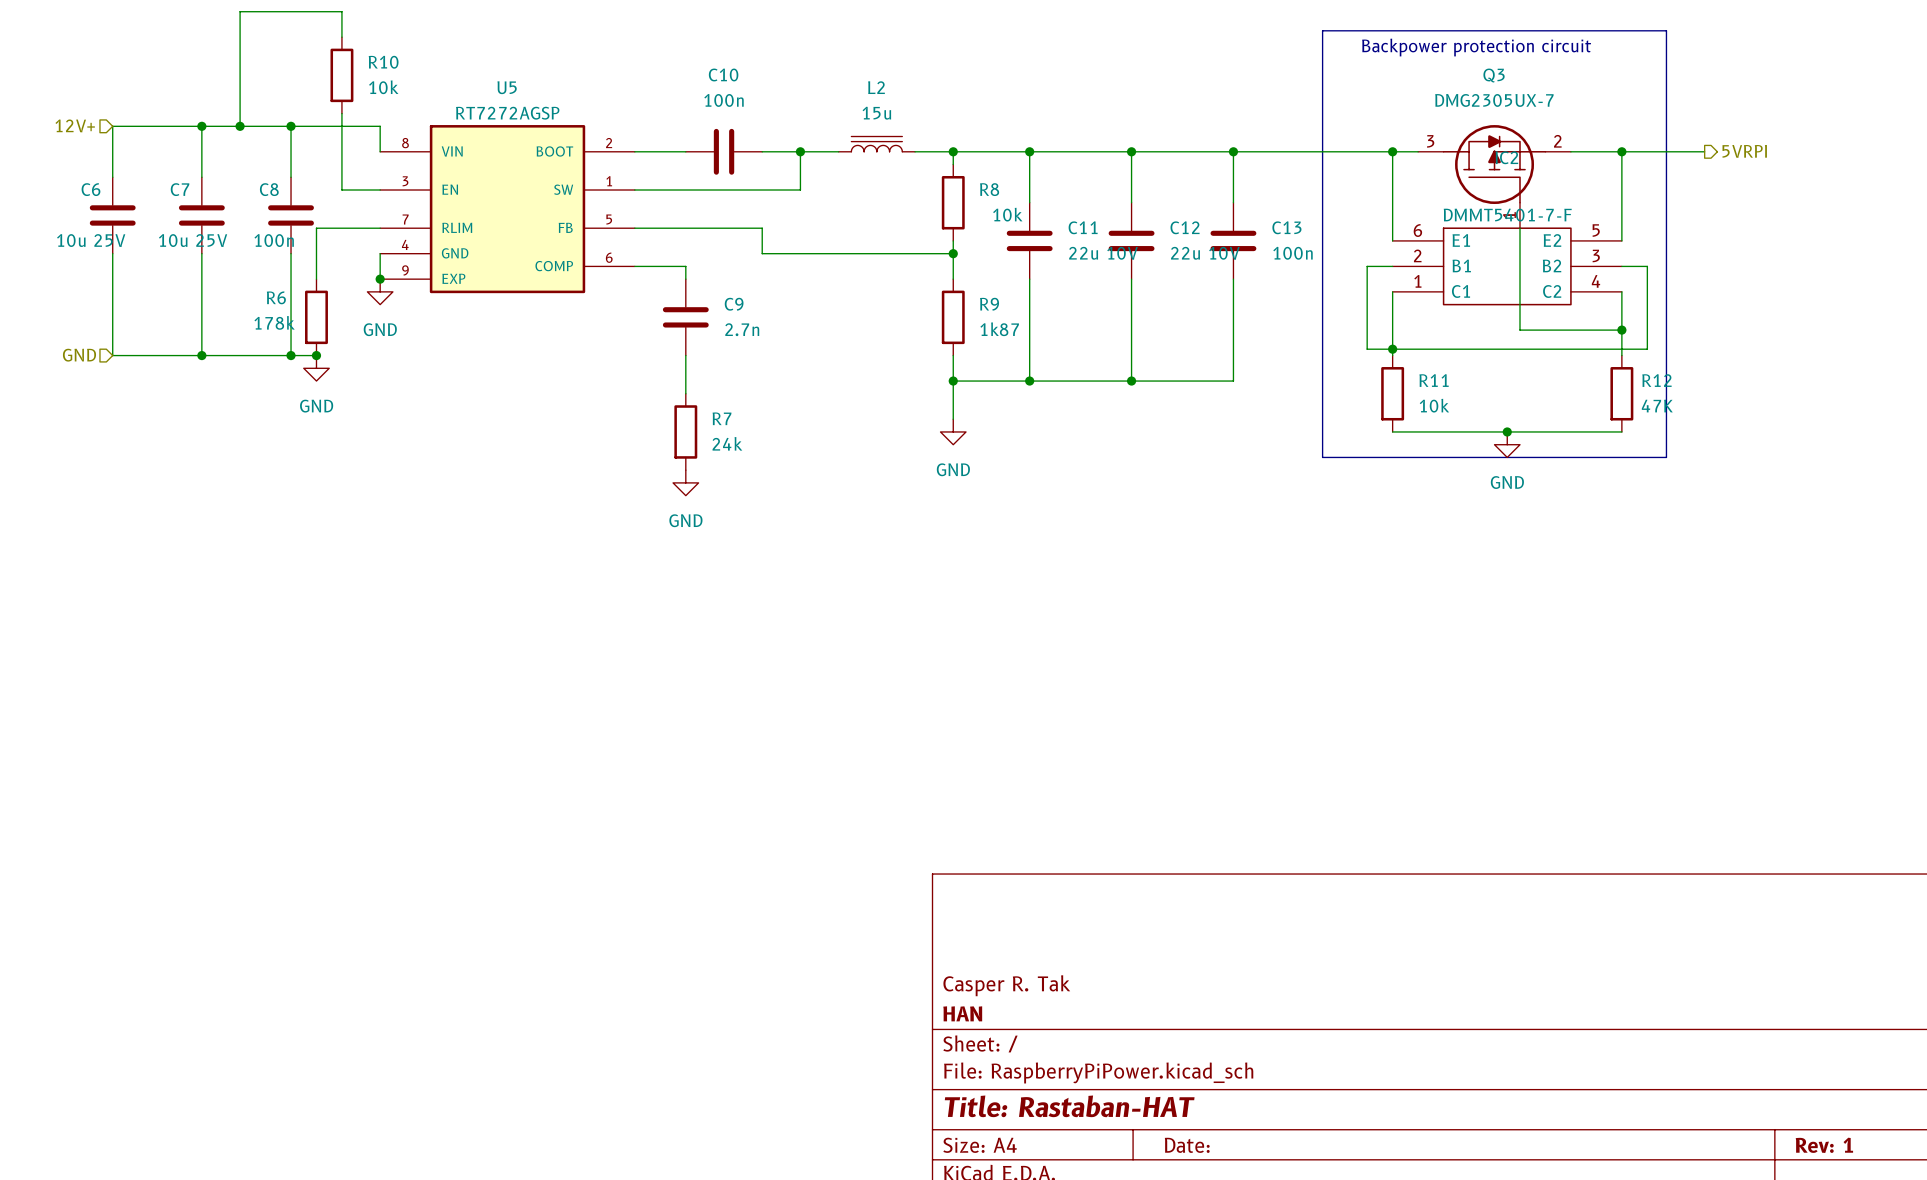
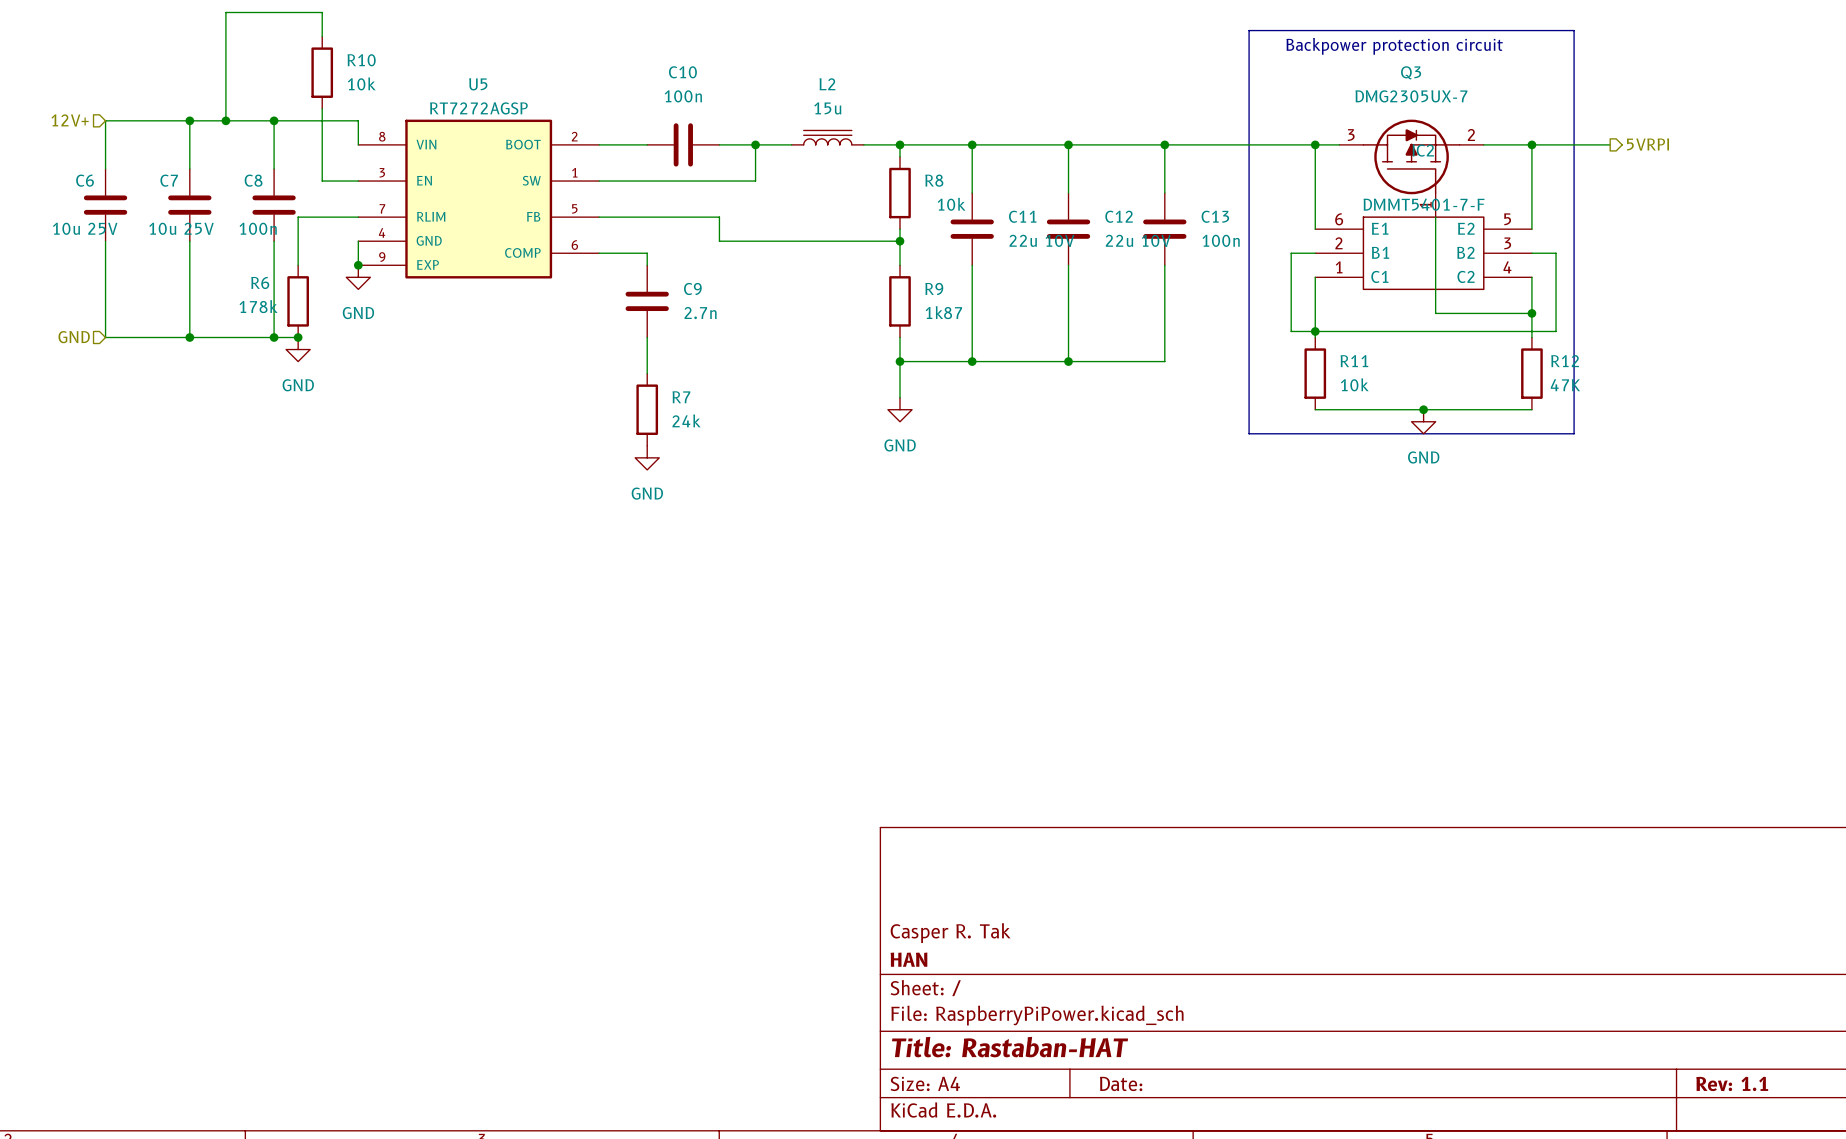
title block: Rev: 1 (1824, 1145) -> Rev: 1.1 (1732, 1083)

